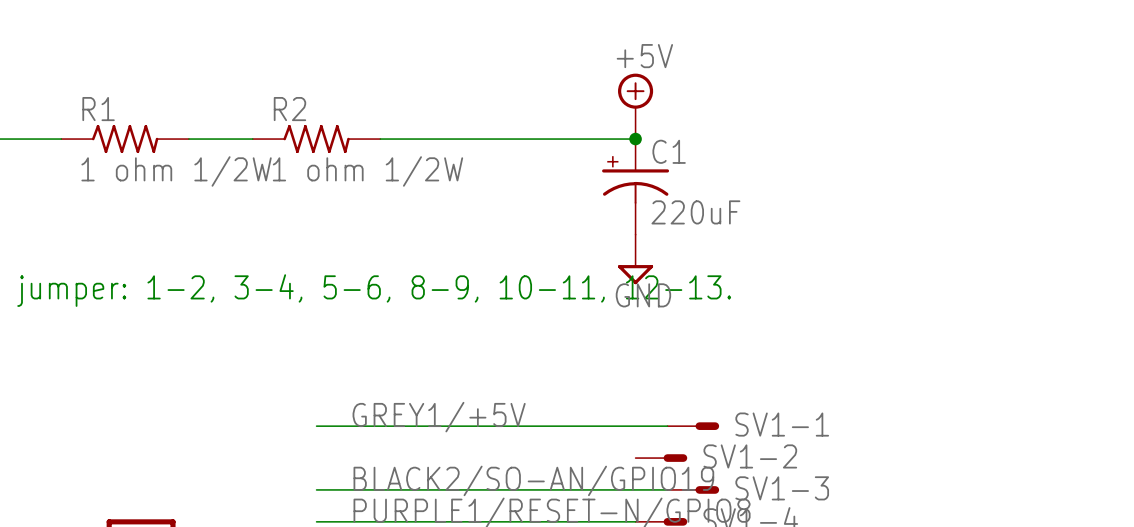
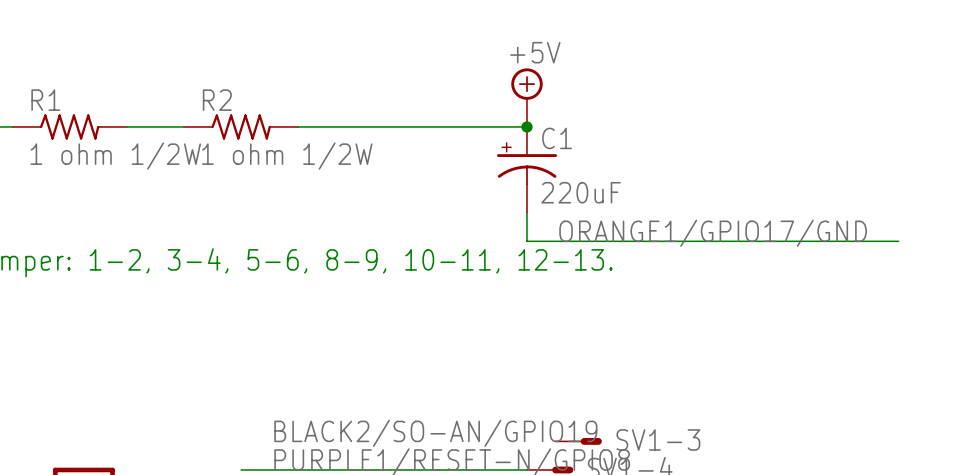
wire: none -> (526, 212) (526, 241) (898, 241)
label: none -> ORANGE1/GPIO17/GND (713, 233)
power symbol: GND (635, 259) -> none
label: GREY1/+5V (439, 417) -> none
wire: (316, 426) (667, 426) -> none
SV1-1: (693, 426) -> none
SV1-2: (661, 458) -> none
wire: (316, 489) (667, 489) -> none

